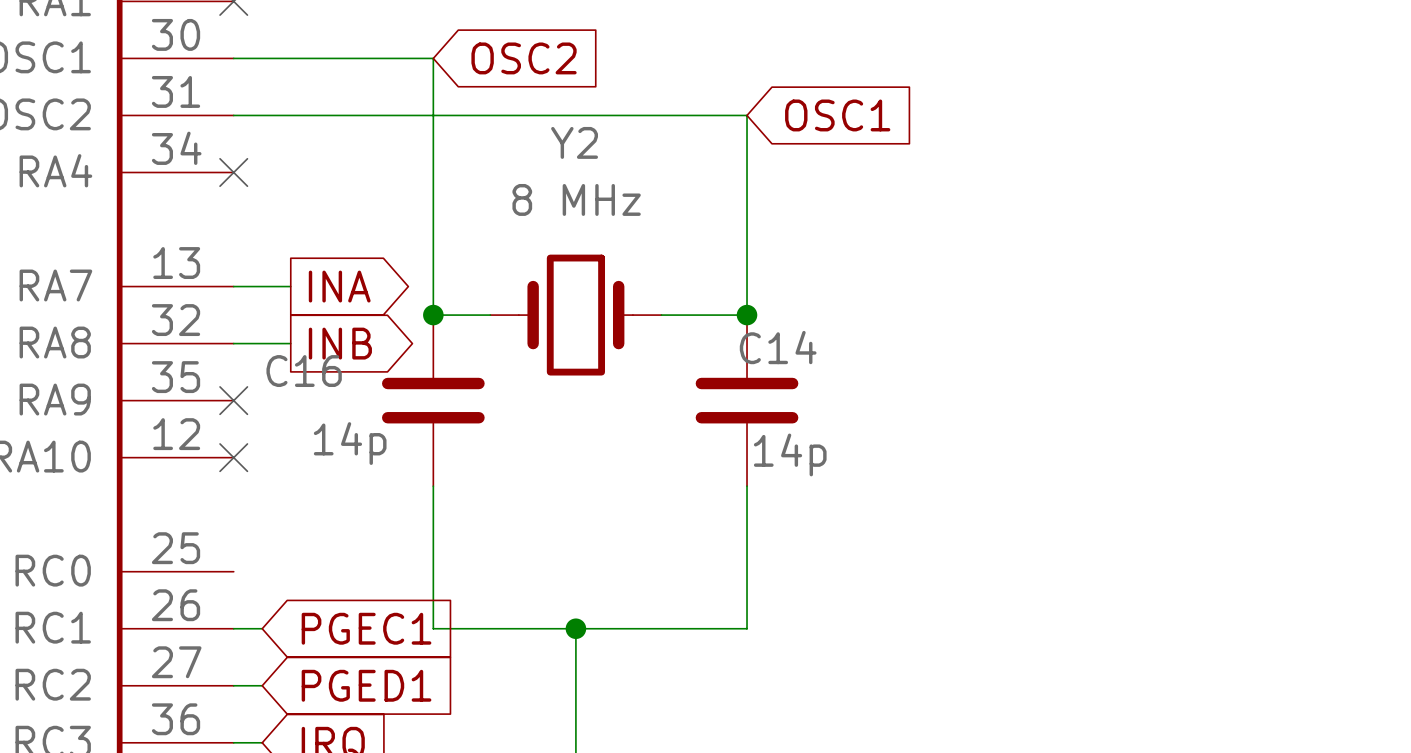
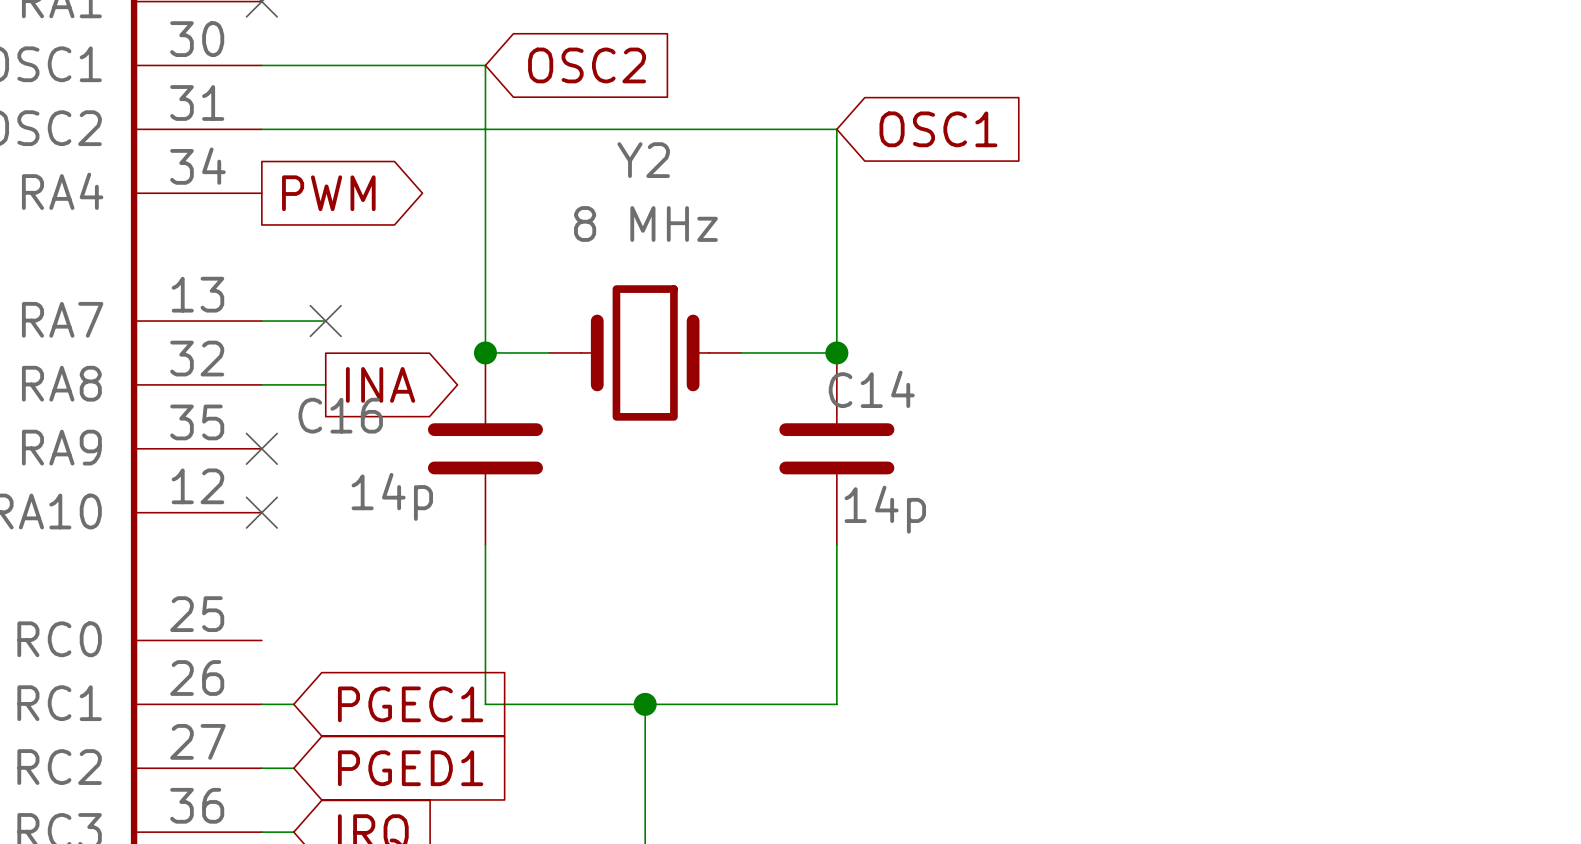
no-connect mark position: (233, 172) -> (325, 321)
global label: none -> PWM (328, 193)
global label: INA (339, 286) -> none
global label: INB (340, 343) -> INA (380, 384)

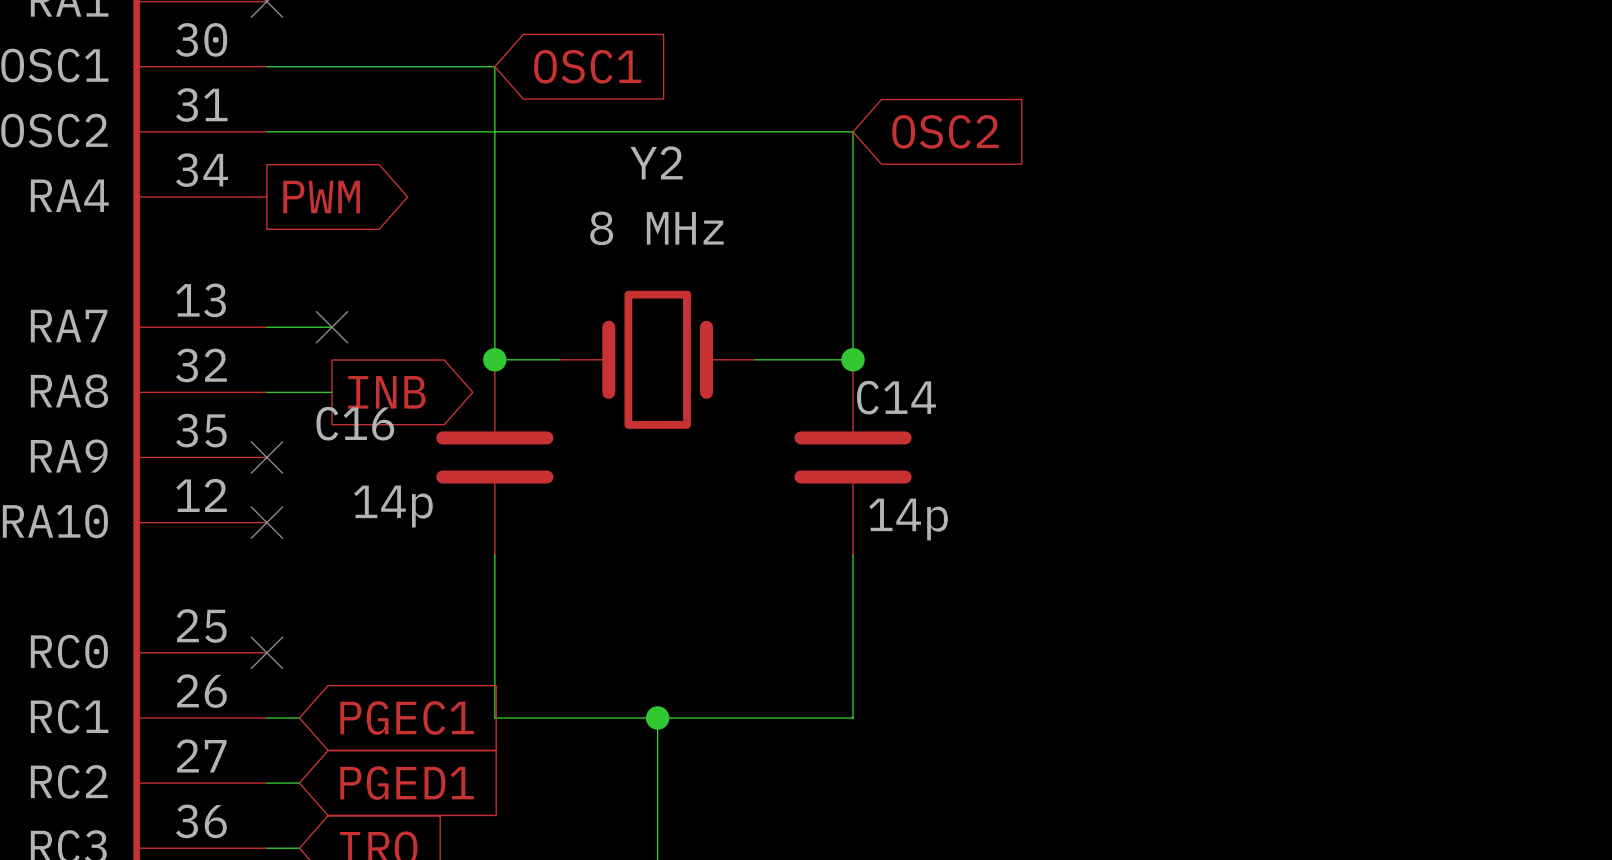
global label: OSC2 (587, 65) -> OSC1 (587, 66)
global label: OSC1 (938, 129) -> OSC2 (945, 131)
global label: INA (380, 384) -> INB (386, 392)
no-connect mark: none -> (266, 652)

